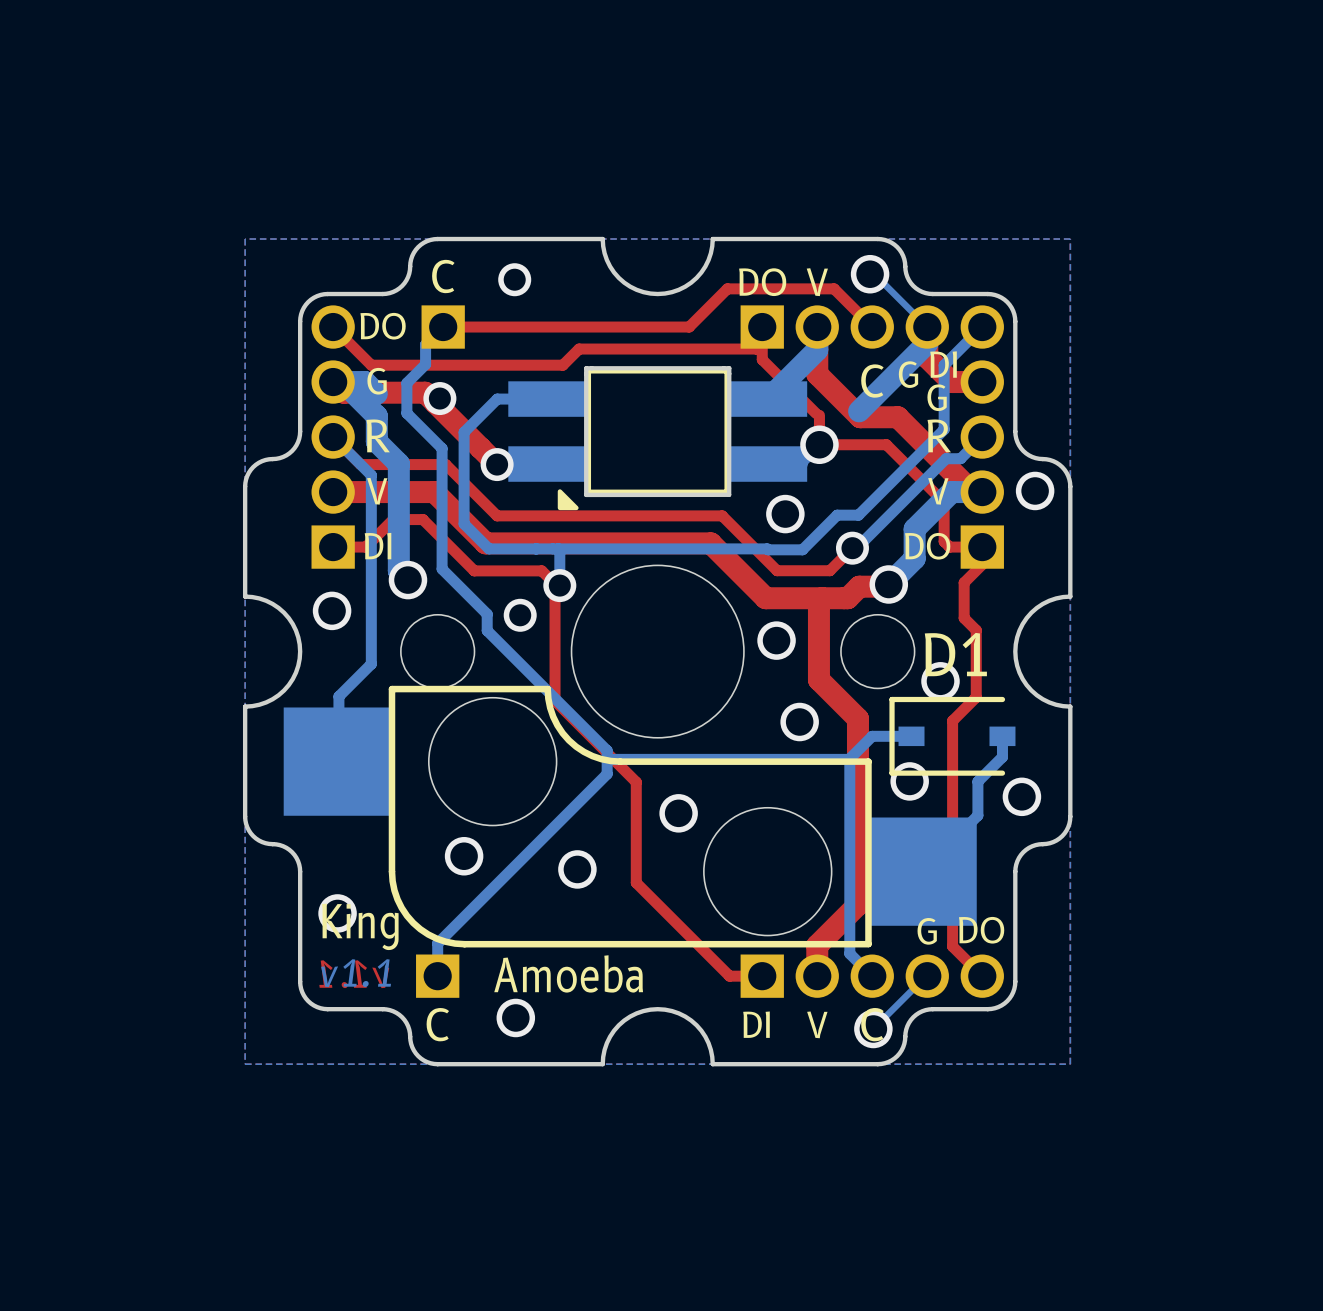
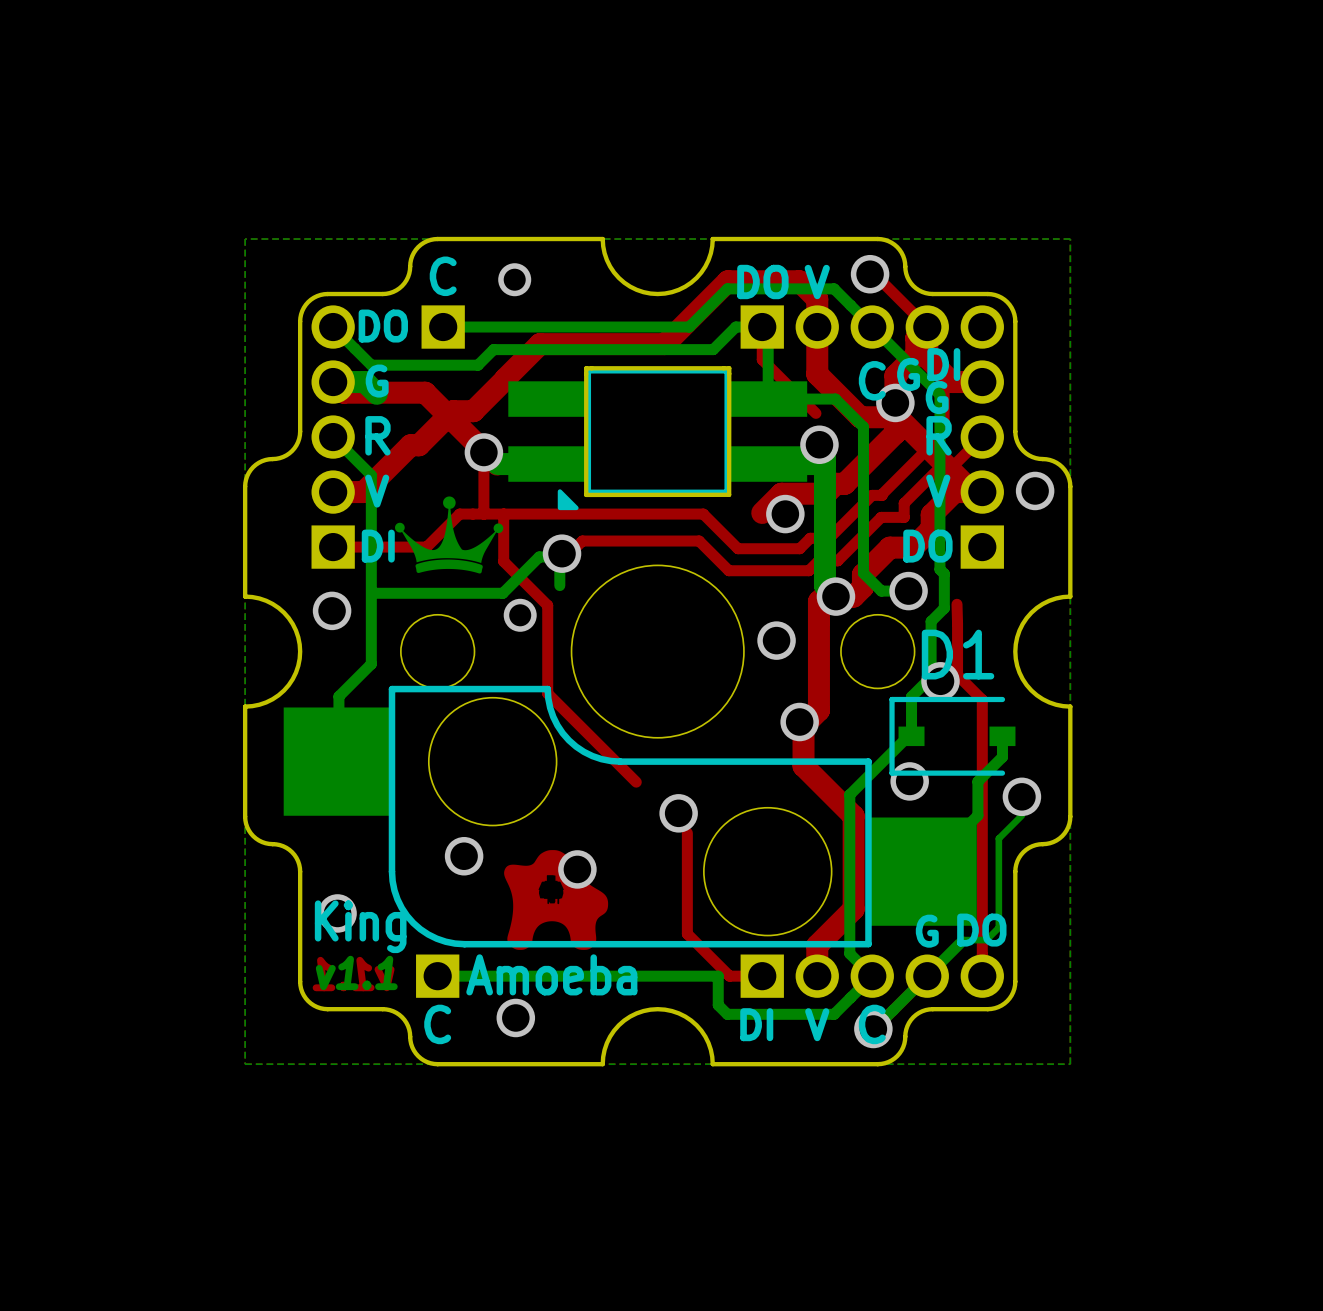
top track: none -> (871, 270) (927, 327) (916, 338) (916, 354) (895, 375) (895, 433) (844, 483) (835, 483) (826, 493) (781, 493) (762, 512)
bottom track: (870, 274) (874, 274) (927, 327) (927, 343) (859, 411) -> none
bottom track: none -> (333, 327) (371, 365) (478, 365) (493, 349) (713, 349) (735, 327) (762, 327) (768, 332) (768, 399) (835, 399) (863, 427) (863, 573) (881, 591) (908, 591)
top track: (333, 327) (371, 365) (562, 365) (579, 349) (757, 349) (762, 343) -> none
bottom track: (443, 327) (425, 344) (425, 364) (406, 383) (406, 413) (442, 448) (442, 569) (487, 614) (487, 630) (607, 750) (607, 774) (437, 943) (437, 976) -> (443, 327) (689, 327) (727, 288) (834, 288) (939, 394) (939, 569) (944, 573) (944, 608) (931, 621) (931, 677) (911, 696) (911, 736)
bottom track: (817, 327) (817, 349) (770, 396) -> none
top track: none -> (817, 327) (817, 299) (799, 281) (727, 281) (665, 344) (539, 344) (505, 378)
top track: (872, 327) (834, 288) (727, 288) (689, 327) (443, 327) -> none
bottom track: (982, 327) (944, 365) (944, 429) (858, 515) (837, 515) (802, 549) (489, 548) (464, 523) (464, 432) (497, 399) (547, 399) -> none
top track: none -> (944, 365) (944, 432) (882, 495) (872, 495) (829, 538) (810, 538) (799, 548) (737, 548) (703, 514) (459, 514) (426, 547) (365, 547)
bottom track: (342, 382) (376, 416) (376, 441) (398, 463) (398, 570) (407, 580) -> none
via: (439, 398) -> none
via: none -> (895, 402)
top track: (819, 415) (819, 444) (886, 444) (944, 502) (944, 541) (949, 547) (982, 547) (982, 564) (964, 582) (964, 618) (976, 630) (976, 697) (952, 720) (952, 946) (982, 976) -> (957, 604) (957, 675) (982, 699) (982, 976)
top track: (333, 437) (360, 464) (445, 464) (497, 515) (722, 515) (777, 570) -> (566, 556) (582, 541) (699, 541) (728, 570) (777, 570)
bottom track: (982, 437) (960, 458) (946, 458) (864, 540) (860, 540) (852, 548) -> none
top track: none -> (483, 452) (483, 514)
via position: (497, 464) -> (483, 452)
bottom track: none -> (824, 464) (802, 464) (824, 441) (824, 585) (835, 596)
top track: (363, 492) (434, 492) (485, 543) (710, 543) (765, 598) (847, 598) (859, 586) (886, 586) (888, 584) -> (363, 492) (410, 445) (418, 445) (453, 411) (473, 411) (505, 379)
top track: none -> (972, 492) (954, 492) (931, 514) (931, 528) (912, 547) (889, 547) (862, 574) (862, 587) (853, 596) (835, 596)
bottom track: (982, 492) (951, 492) (914, 529) (914, 558) (888, 584) -> none
drawing: none -> [394, 496, 504, 574]
top track: (365, 547) (393, 519) (422, 519) (474, 570) (541, 570) (556, 585) (559, 585) (555, 592) (555, 700) -> (503, 514) (503, 561) (547, 605) (547, 693) (555, 700)
top track: (852, 548) (829, 570) (808, 570) -> (982, 437) (954, 464) (943, 464) (904, 503) (904, 517) (881, 517) (837, 560) (818, 560) (808, 570)
via: (852, 548) -> none
bottom track: none -> (566, 556) (539, 556) (502, 593) (373, 593)
via: (407, 580) -> none
via position: (888, 584) -> (908, 591)
via position: (559, 585) -> (562, 553)
via: none -> (835, 596)
top track: (818, 679) (857, 718) (857, 904) (853, 909) -> (818, 679) (818, 710) (803, 725) (803, 766) (853, 816) (853, 909)
bottom track: (908, 736) (872, 736) (849, 759) -> (908, 736) (849, 794)
bottom track: (849, 759) (607, 759) -> none
bottom track: (849, 759) (849, 794) -> none
top track: (636, 782) (636, 882) (687, 933) -> (687, 833) (687, 933)
bottom track: none -> (1021, 815) (998, 838) (998, 927) (986, 940) (960, 940)
drawing: none -> [504, 850, 609, 950]
bottom track: none -> (959, 943) (884, 1019)
bottom track: none -> (872, 976) (834, 1014) (727, 1014) (718, 1005) (718, 976) (437, 976)
bottom track: (927, 976) (873, 1028) -> none

